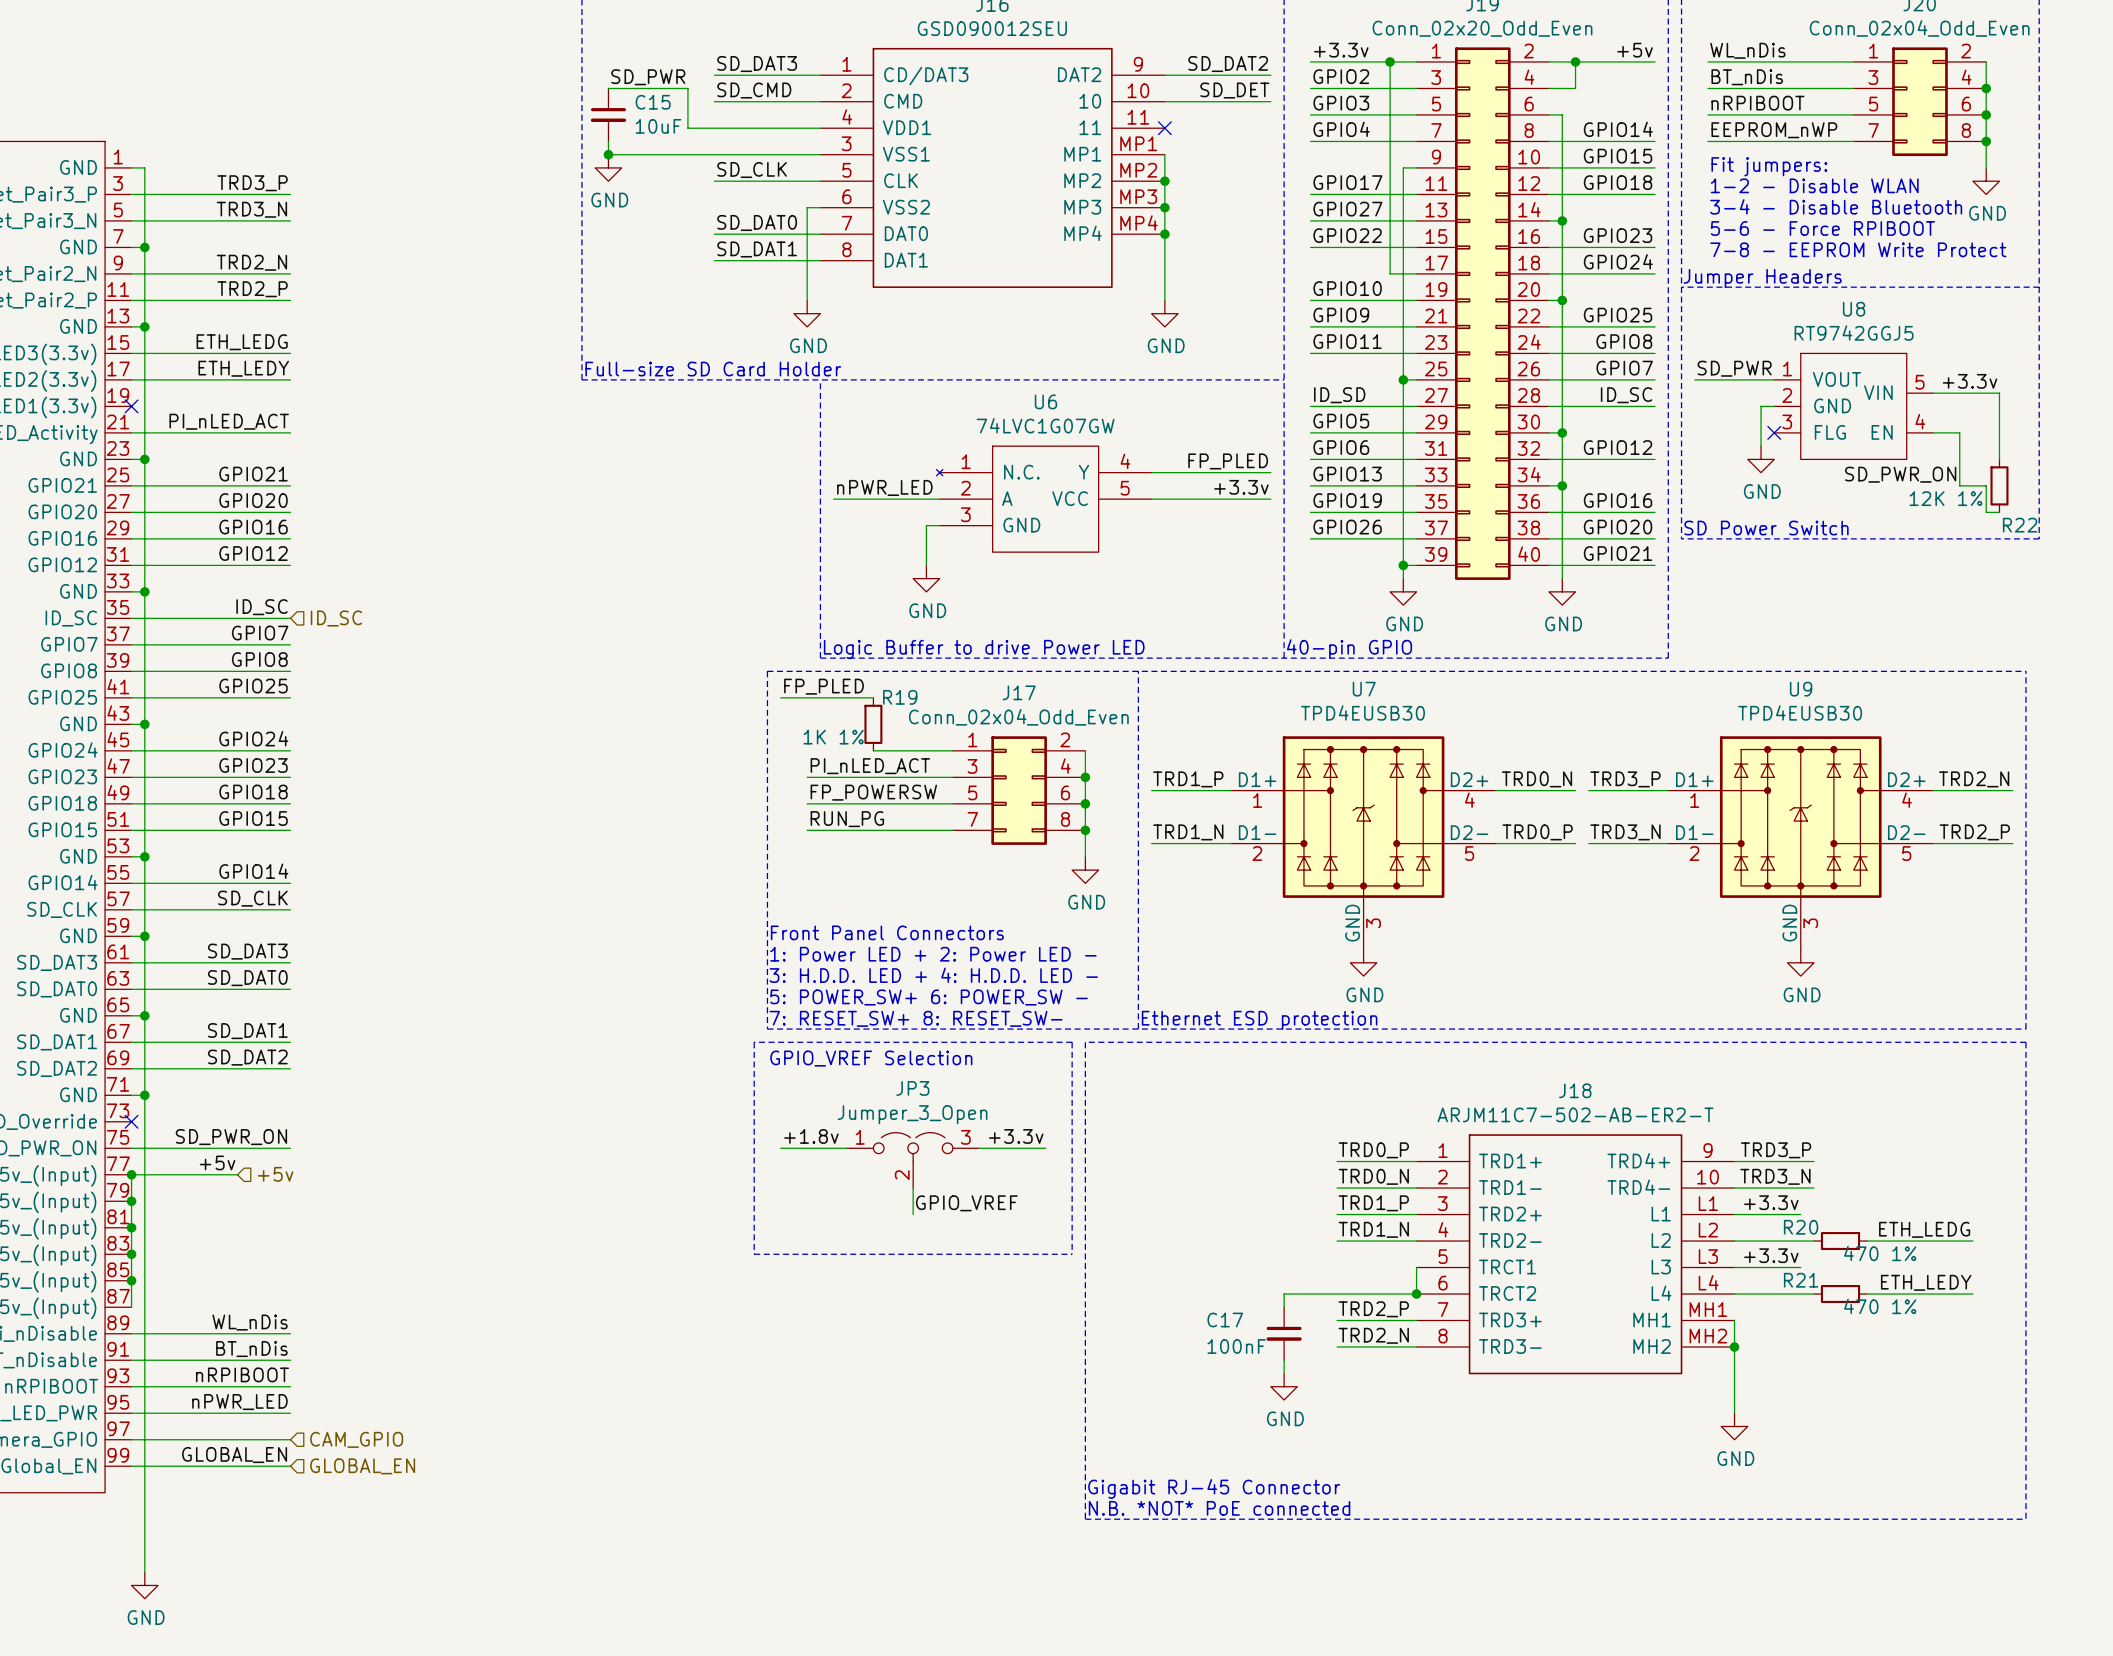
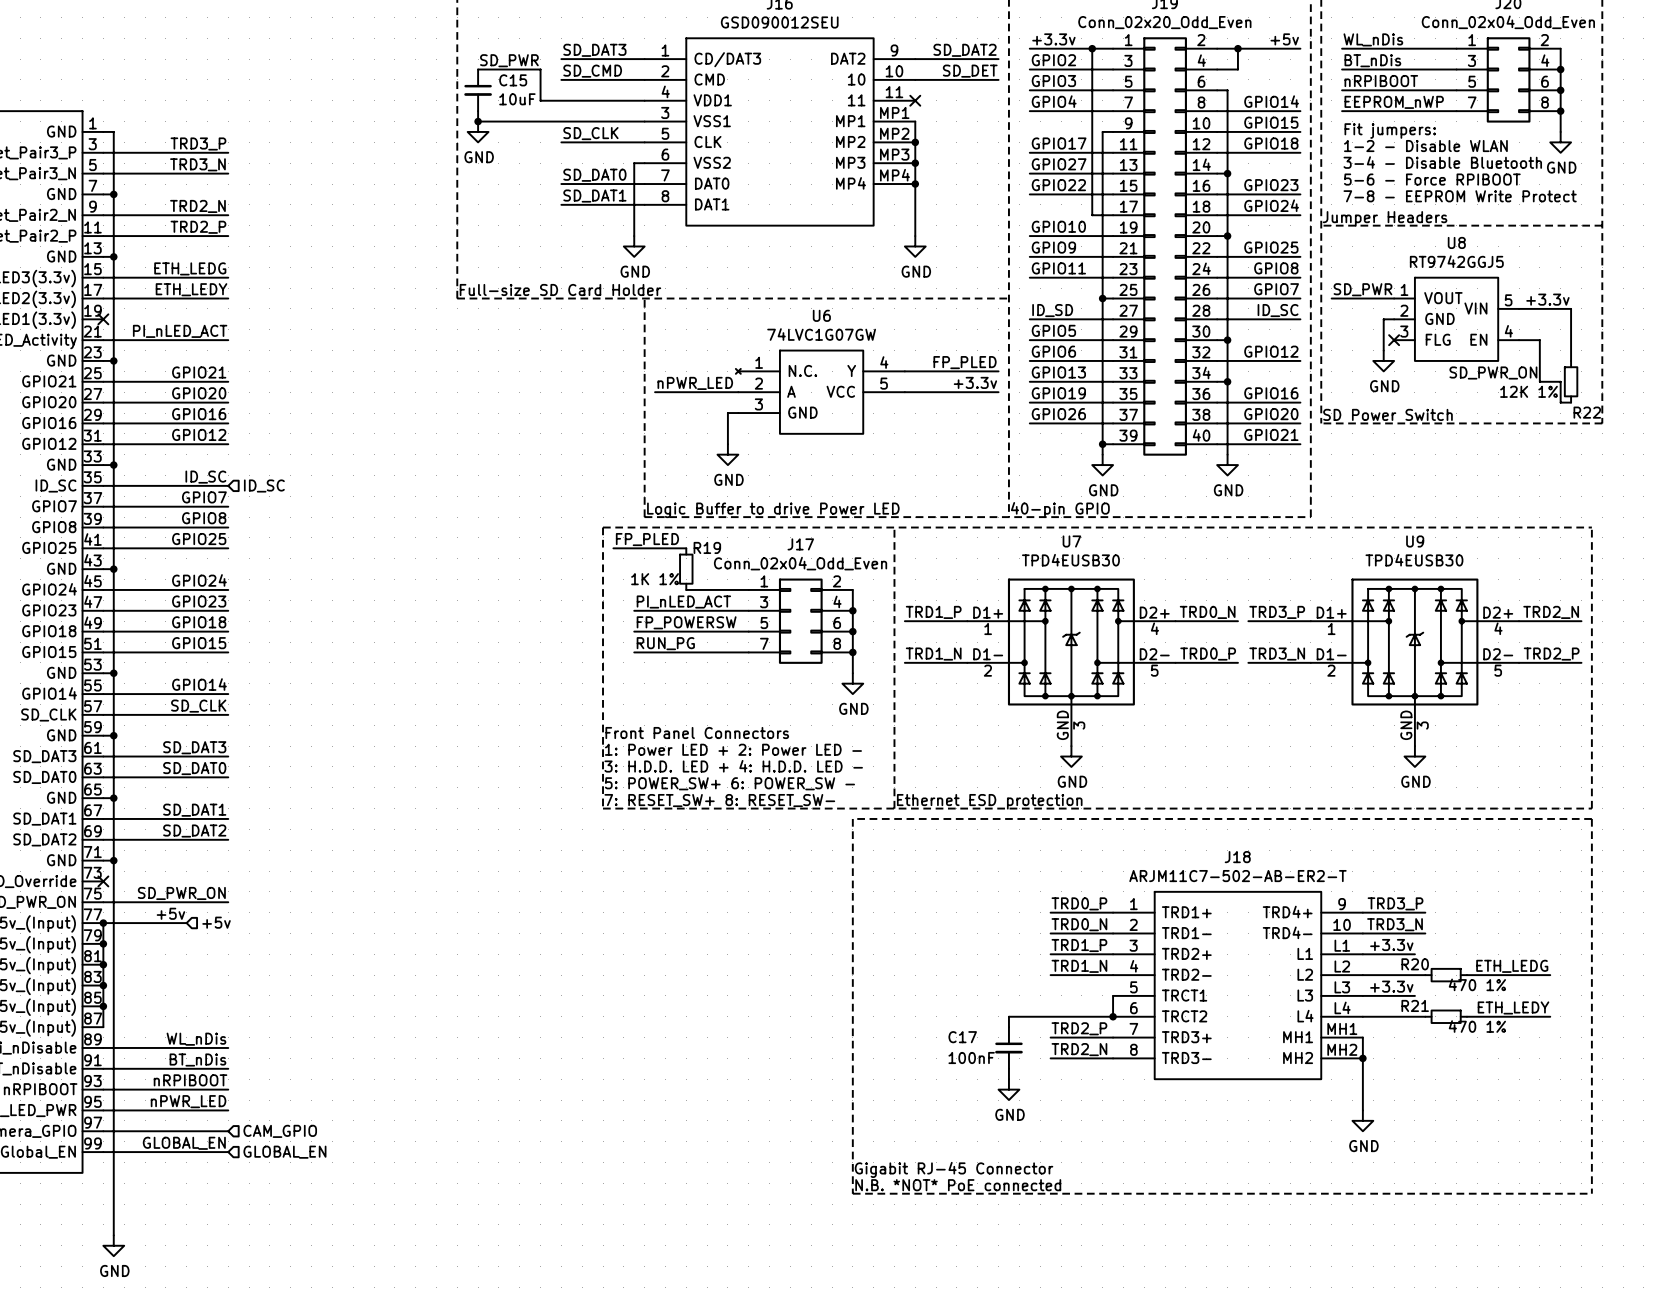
line: (754, 1042) (1072, 1042) (1072, 1254) (754, 1254) (754, 1042) -> none
text: GPIO_VREF Selection (871, 1058) -> none
label: +1.8v (811, 1136) -> none
label: +3.3v (1016, 1136) -> none
wire: (780, 1148) (846, 1148) -> none
wire: (979, 1148) (1045, 1148) -> none
JP3: Jumper_3_Open (913, 1160) -> none
wire: (913, 1188) (913, 1214) -> none
label: GPIO_VREF (966, 1203) -> none

